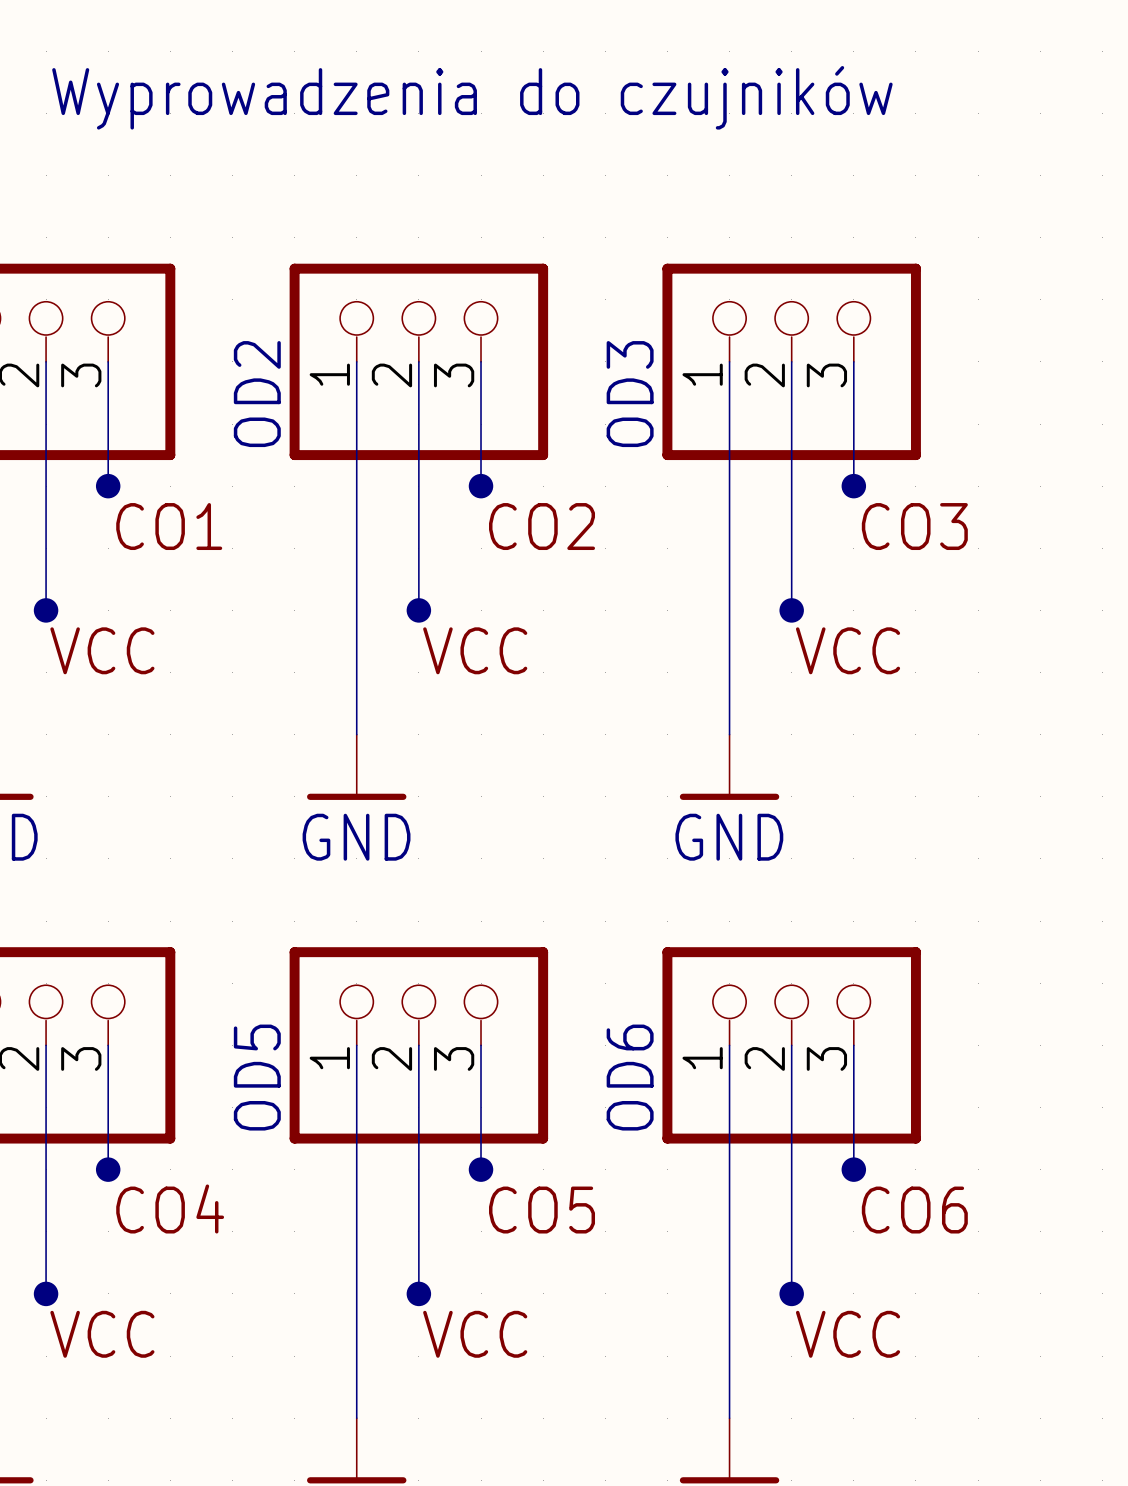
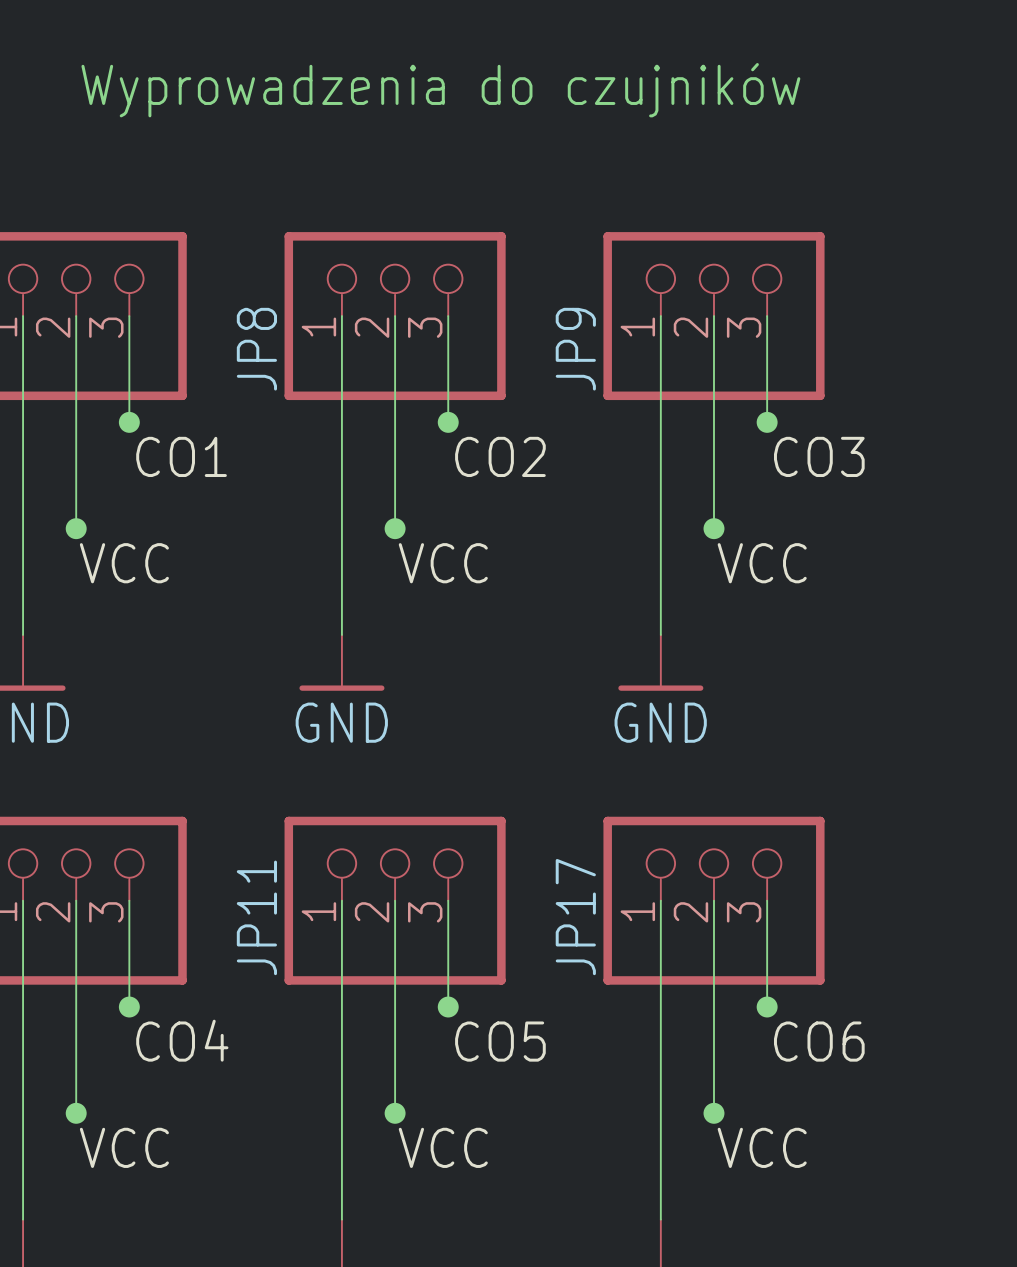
OD2 name: OD2 (257, 394) -> JP8 (256, 349)
OD3 name: OD3 (630, 394) -> JP9 (575, 349)
OD5 name: OD5 (257, 1077) -> JP11 (256, 917)
OD6 name: OD6 (630, 1077) -> JP17 (575, 917)

